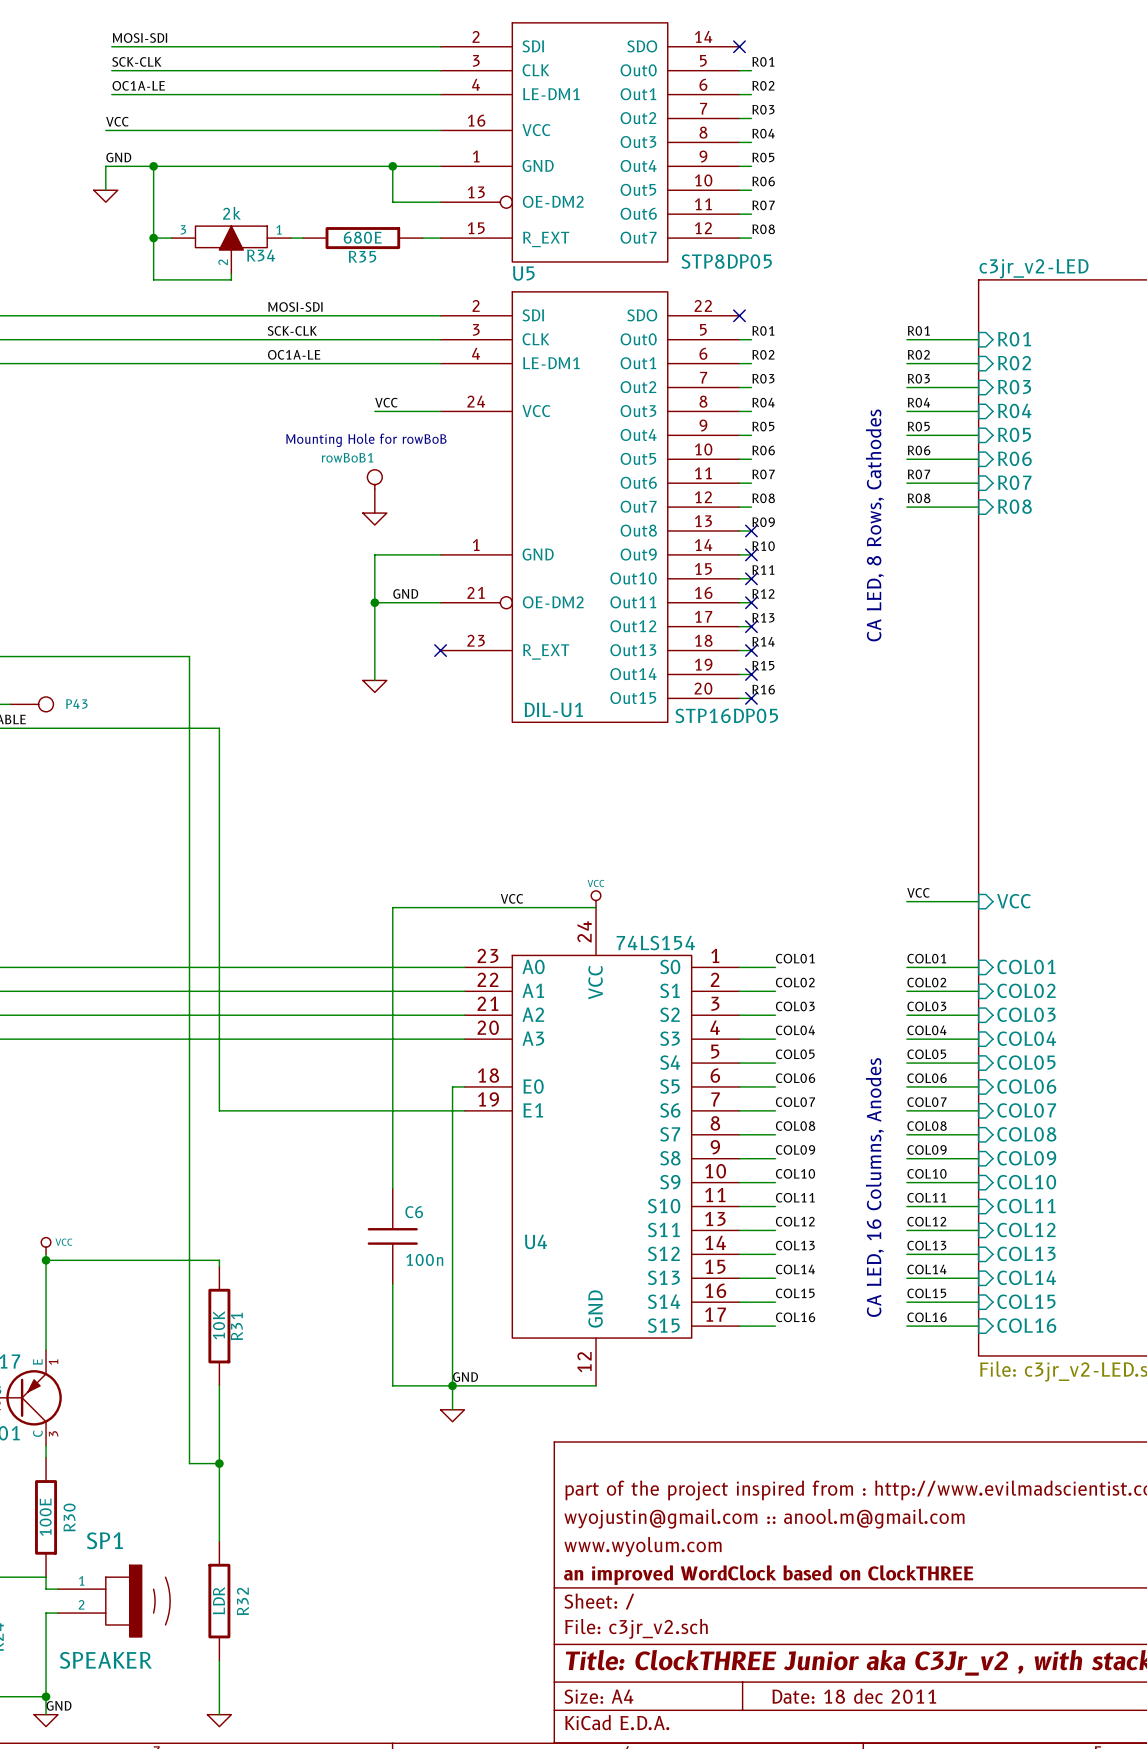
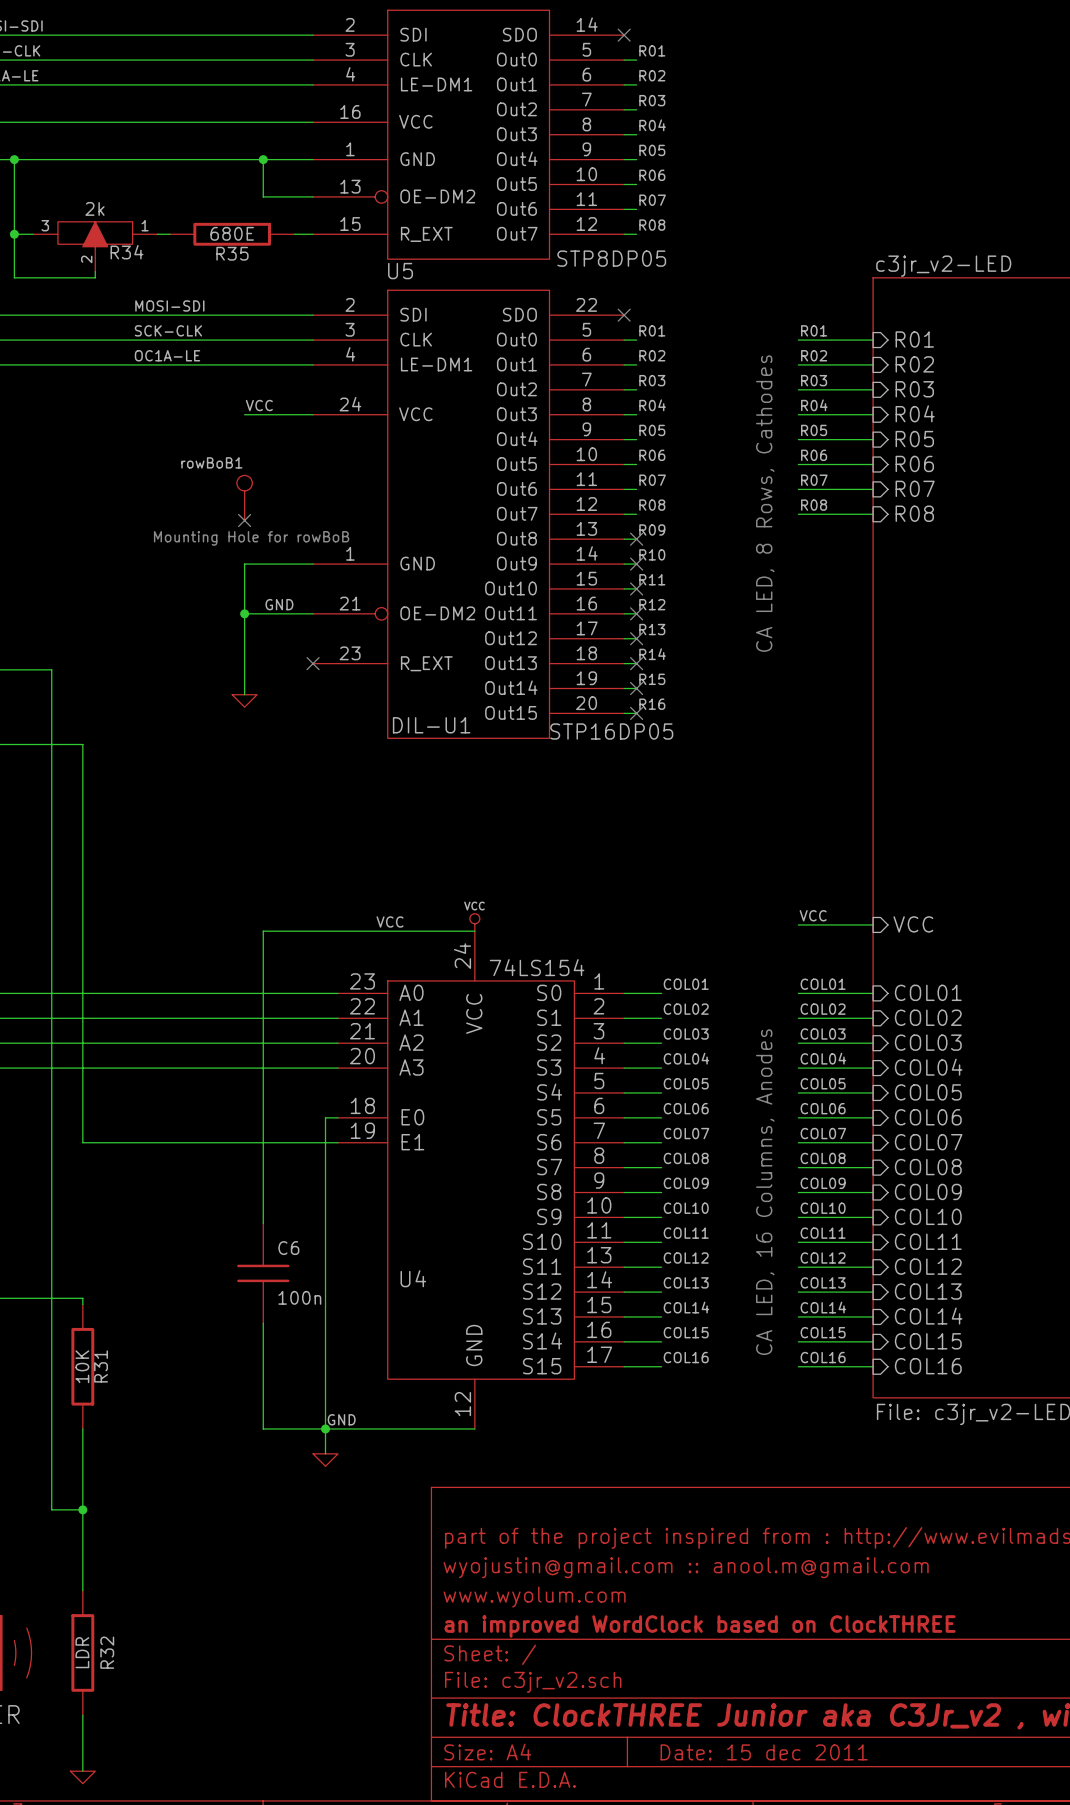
text position: Mounting Hole for rowBoB (366, 440) -> Mounting Hole for rowBoB (251, 538)
no-connect mark: none -> (244, 520)
power symbol: (374, 519) -> none
title block: Date: 18 dec 2011 (854, 1696) -> Date: 15 dec 2011 (764, 1752)

